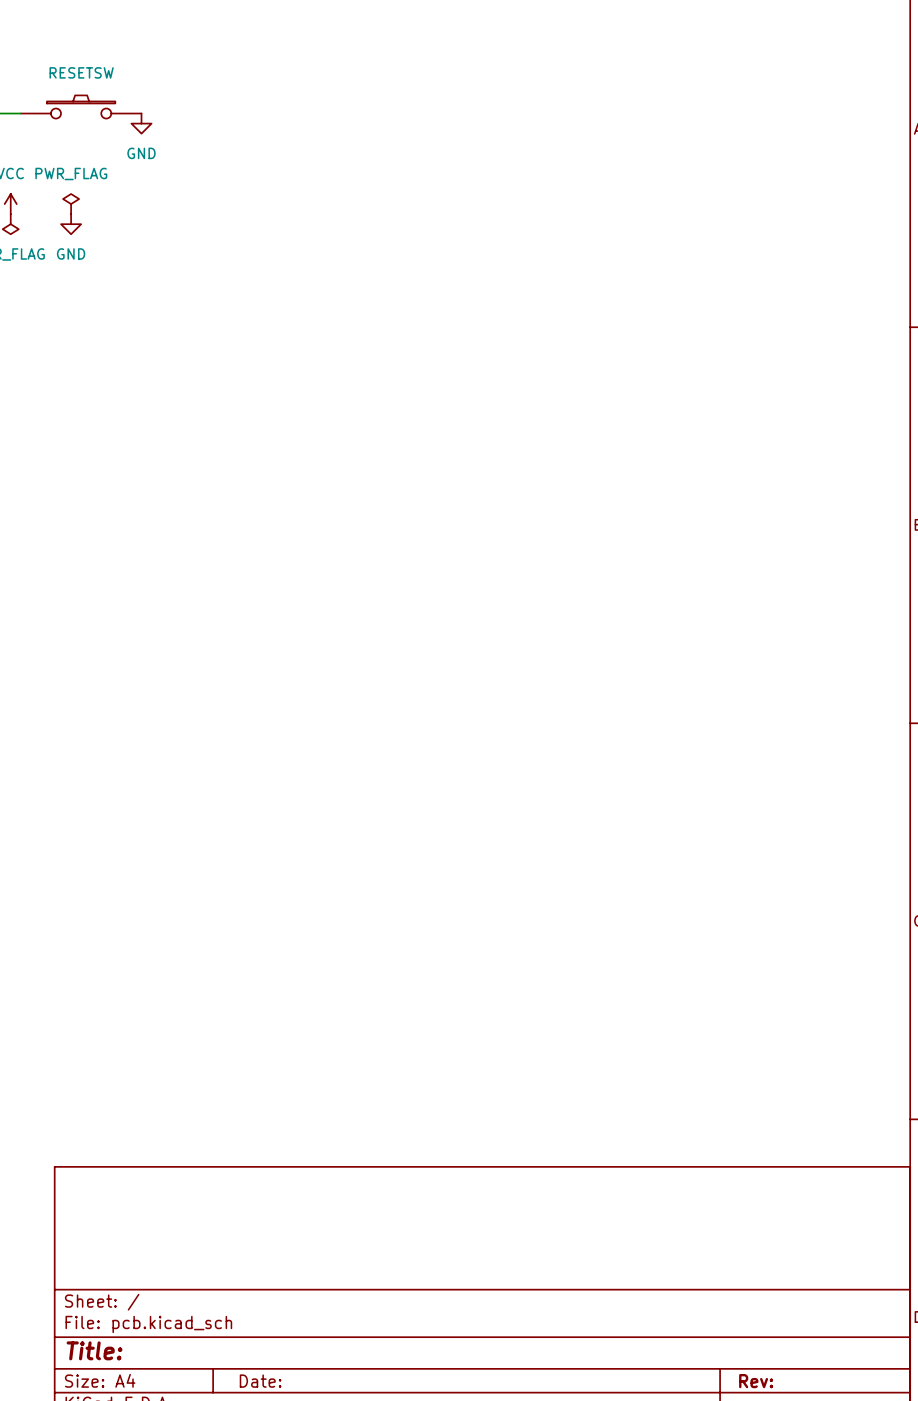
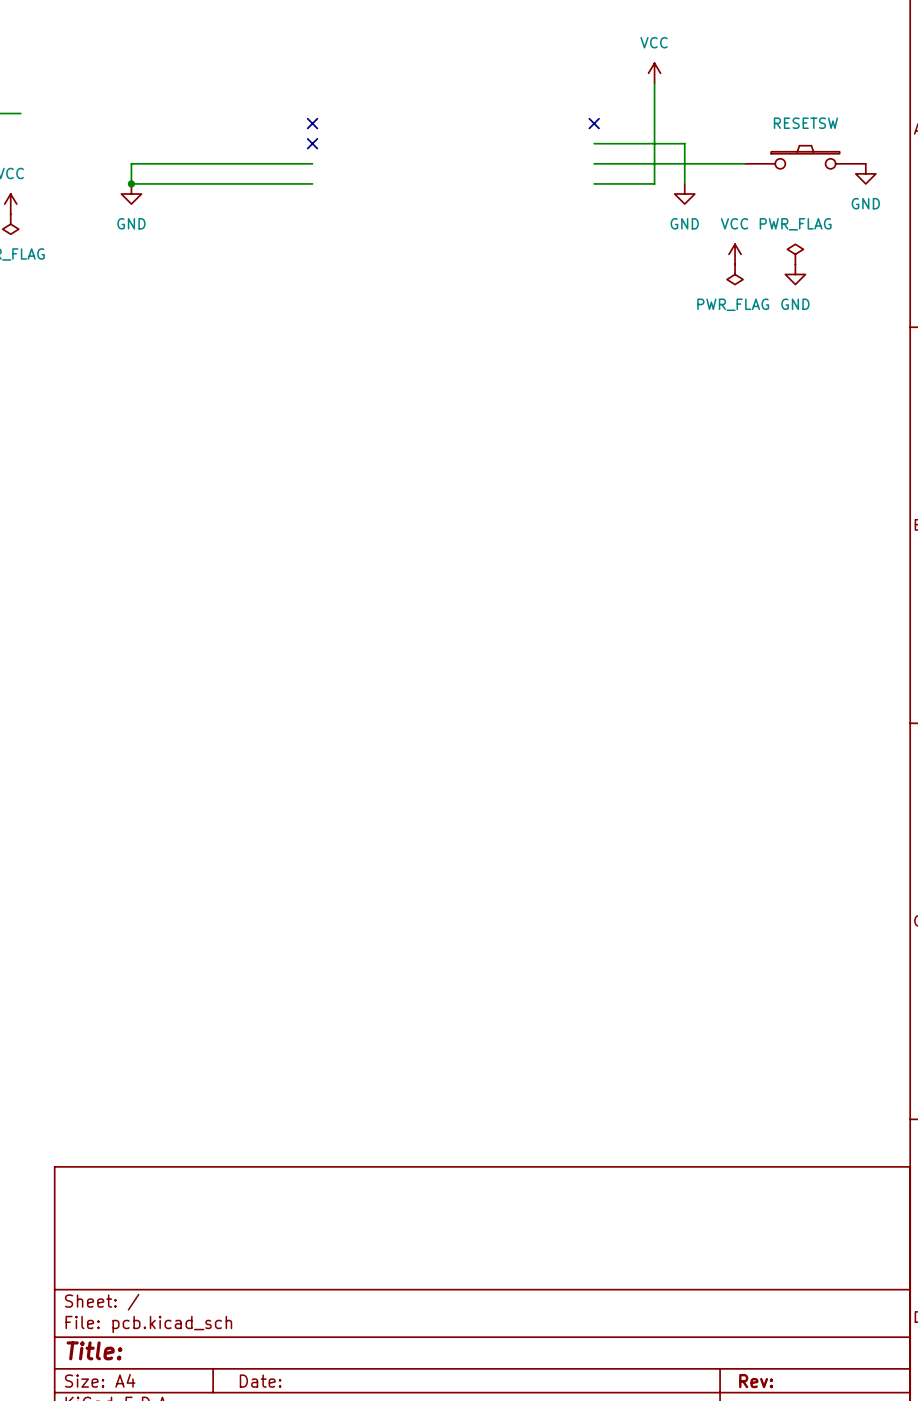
power symbol: none -> VCC (654, 73)
wire: none -> (654, 83) (654, 183) (594, 183)
part: RESETSW (81, 106) -> none
power symbol: GND (141, 123) -> none
no-connect mark: none -> (312, 123)
no-connect mark: none -> (594, 123)
no-connect mark: none -> (312, 143)
wire: none -> (594, 143) (684, 143) (684, 183)
part: none -> RESETSW (805, 157)
wire: none -> (312, 163) (131, 163) (131, 183) (312, 183)
wire: none -> (594, 163) (745, 163)
power symbol: none -> GND (865, 173)
junction: none -> (131, 183)
power symbol: none -> GND (131, 194)
power symbol: none -> GND (684, 194)
power symbol: PWR_FLAG (71, 204) -> none
power symbol: GND (71, 224) -> none
power symbol: none -> VCC (735, 254)
power symbol: none -> PWR_FLAG (795, 254)
power symbol: none -> PWR_FLAG (735, 274)
power symbol: none -> GND (795, 274)

